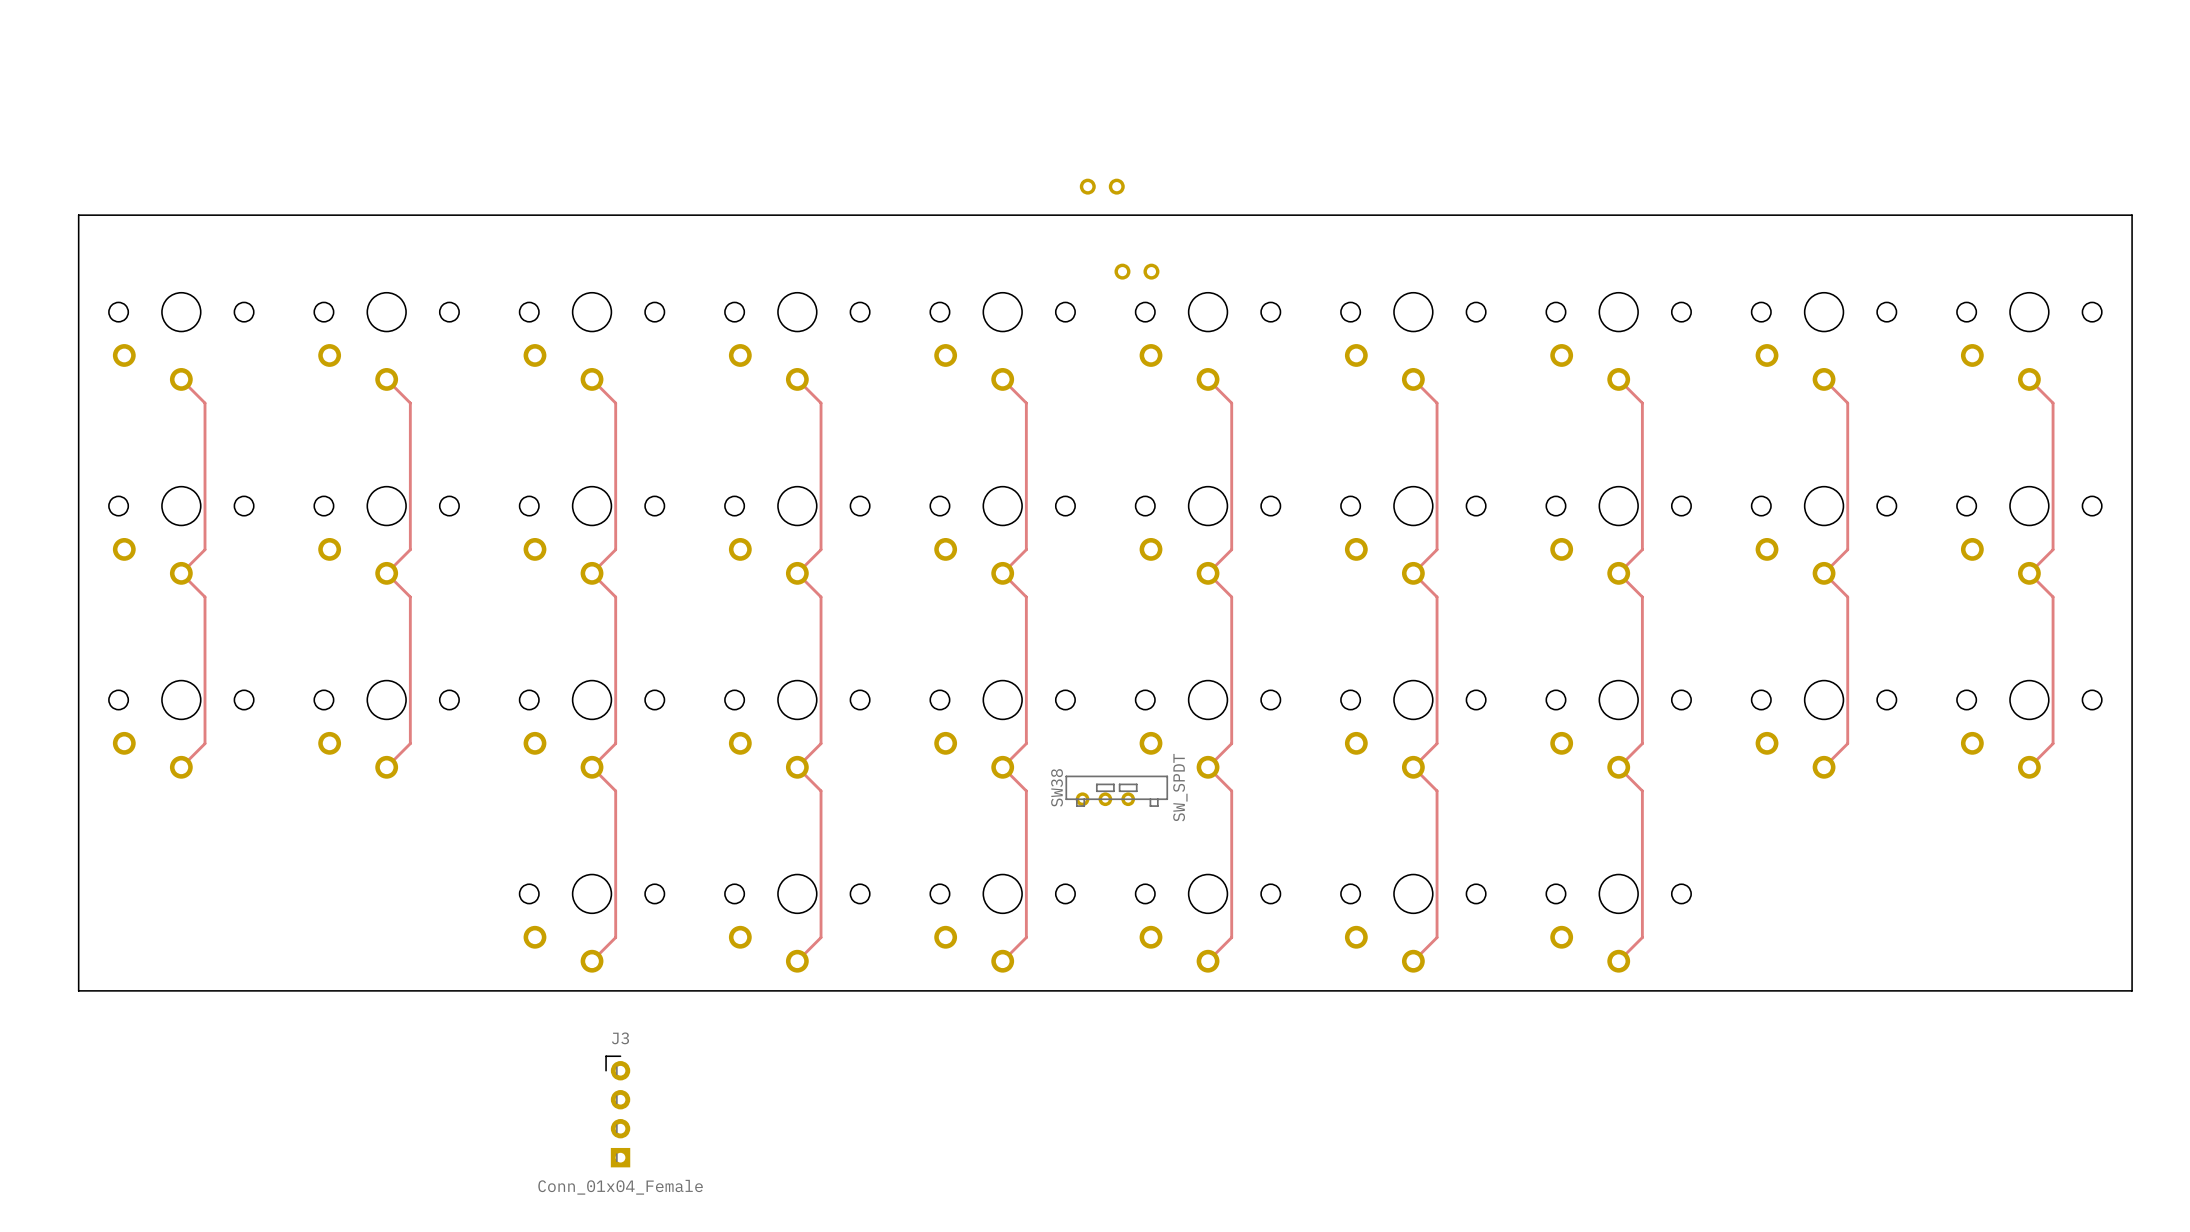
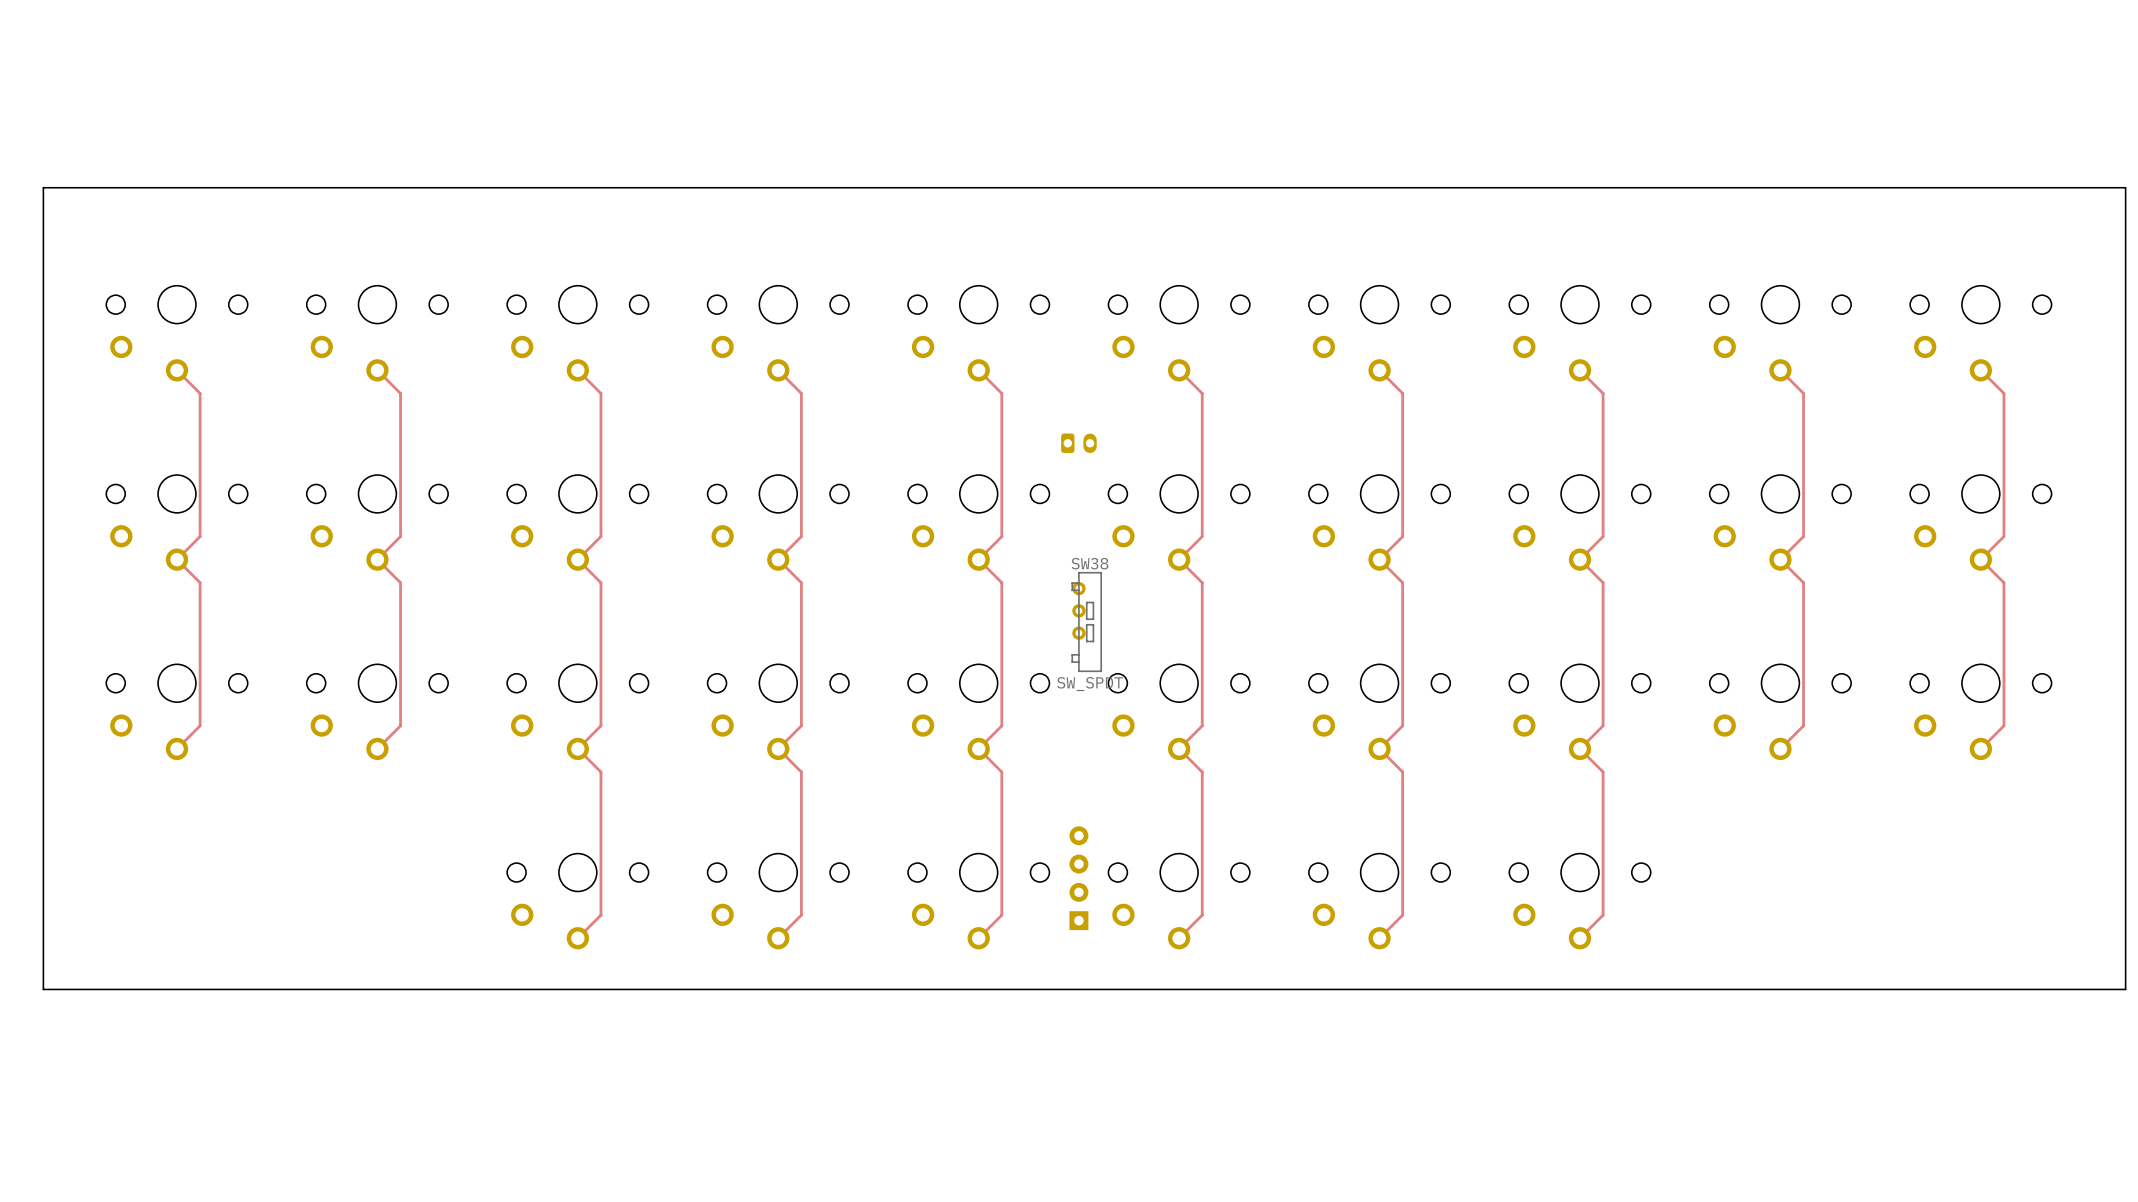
part: (1102, 186) -> none
board edge: (78, 215) (2132, 215) (2132, 990) (78, 990) (78, 215) -> (43, 187) (43, 989) (2125, 989) (2125, 187) (43, 187)
part: (1136, 271) -> none
part: none -> (1078, 443)
SW38 rotation: 0° (1116, 791) -> 90° clockwise (1086, 622)
SW38 position: (1116, 791) -> (1086, 622)
part: none -> (1078, 878)
J3: Conn_01x04_Female (617, 1111) -> none

